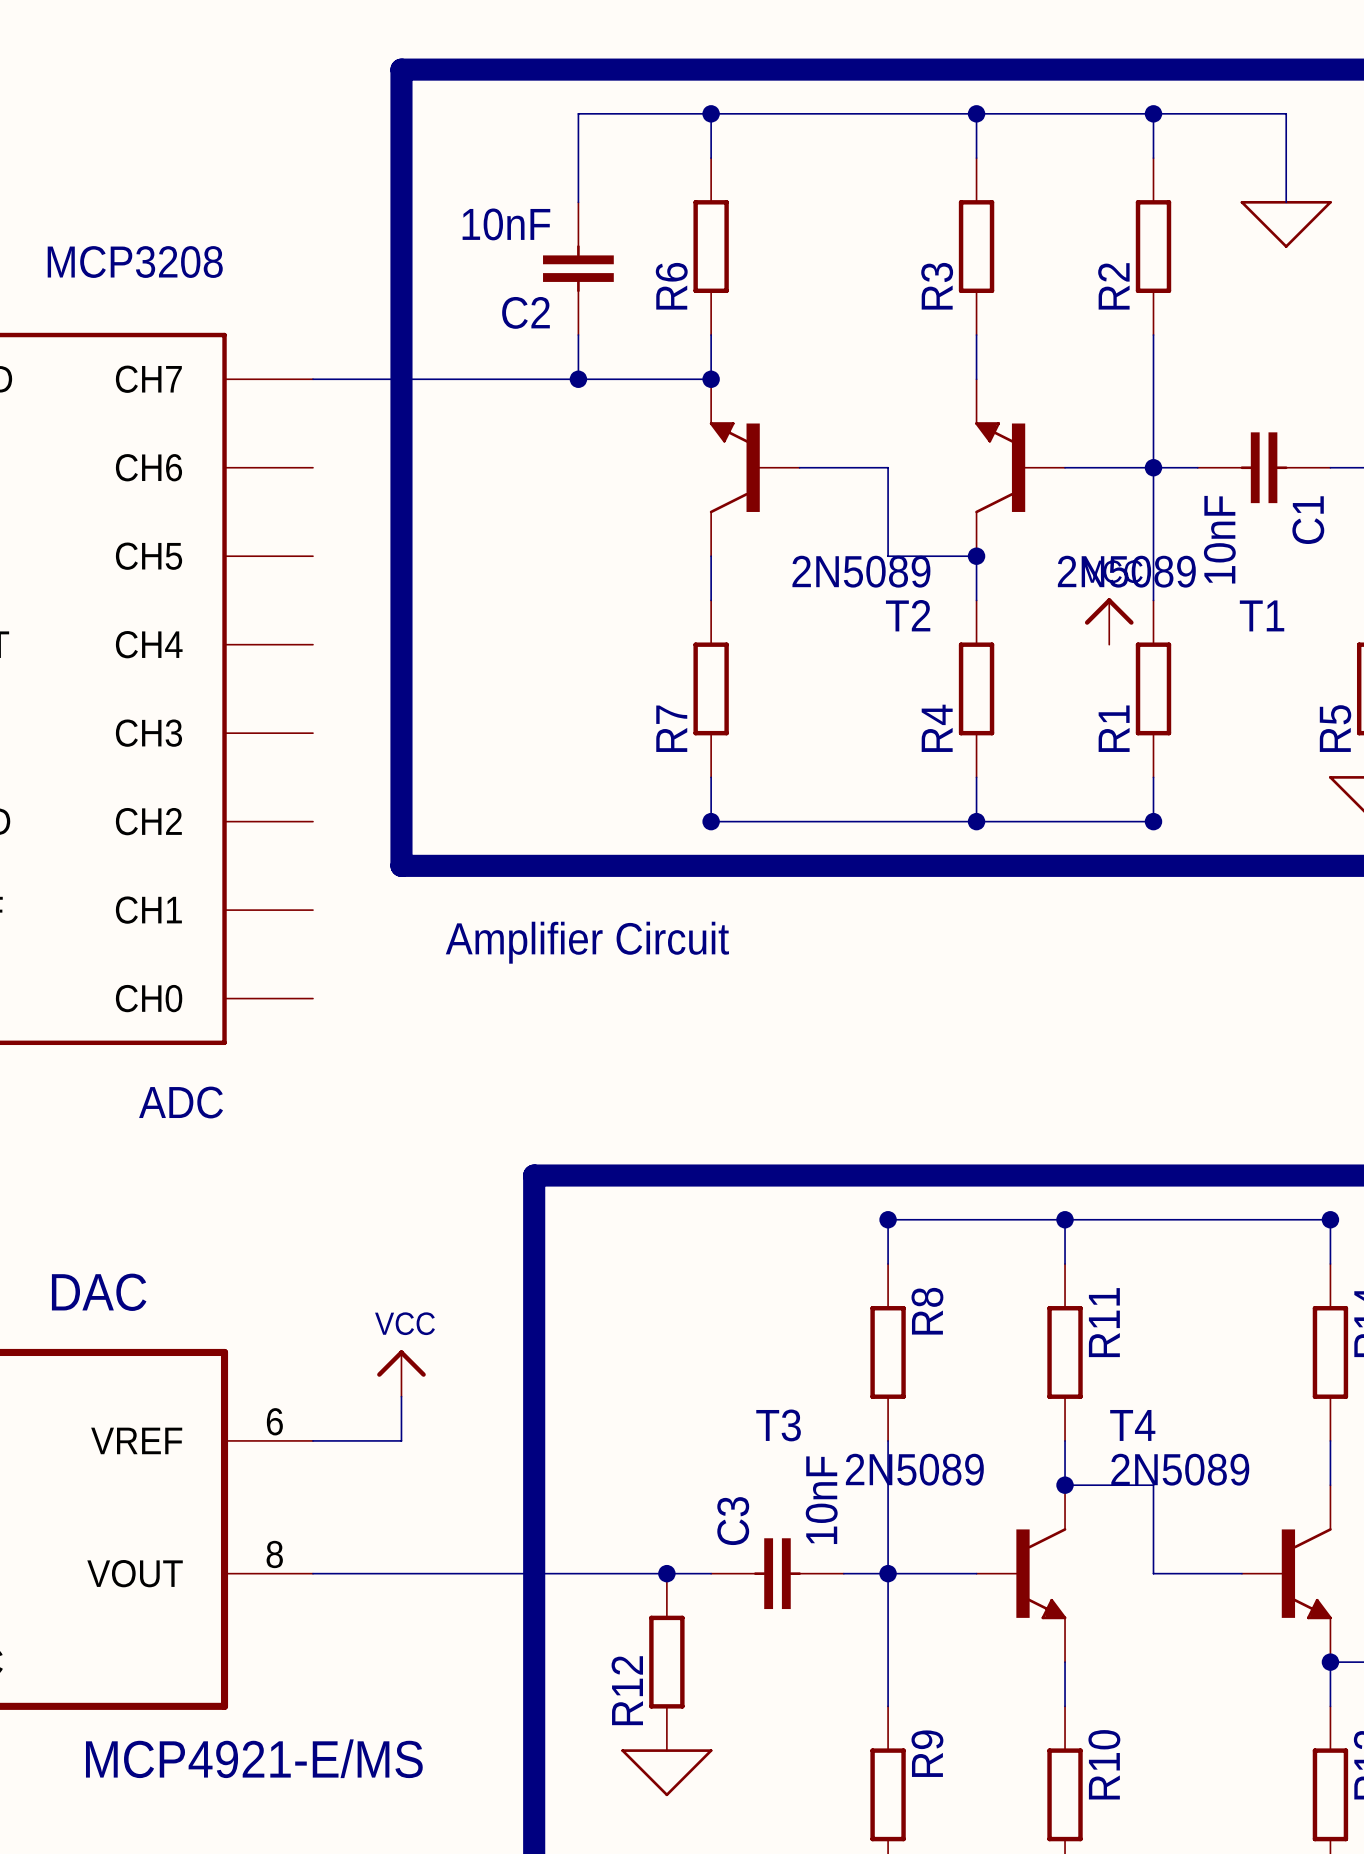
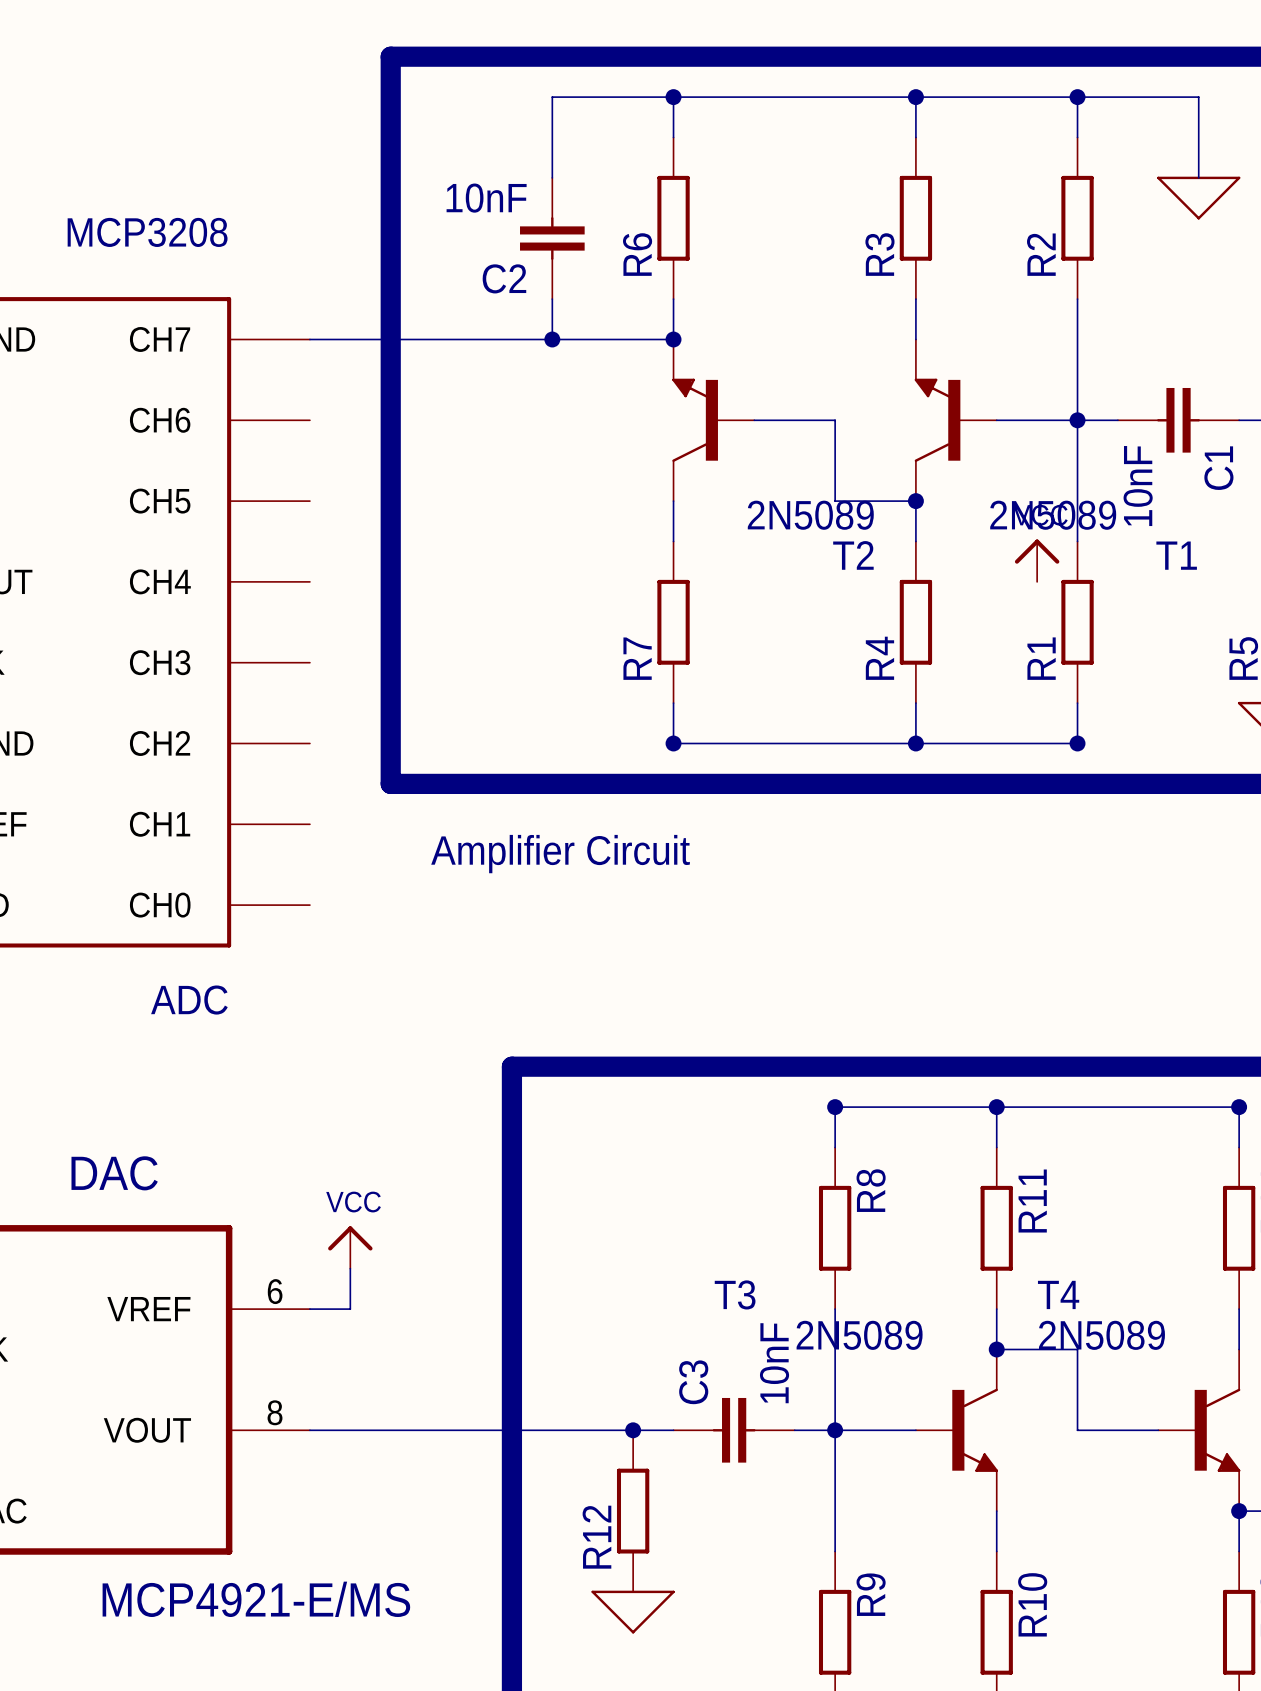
power symbol position: VCC (401, 1373) -> VCC (350, 1247)
wire: (401, 1396) (401, 1440) (357, 1440) -> (350, 1268) (350, 1309)

